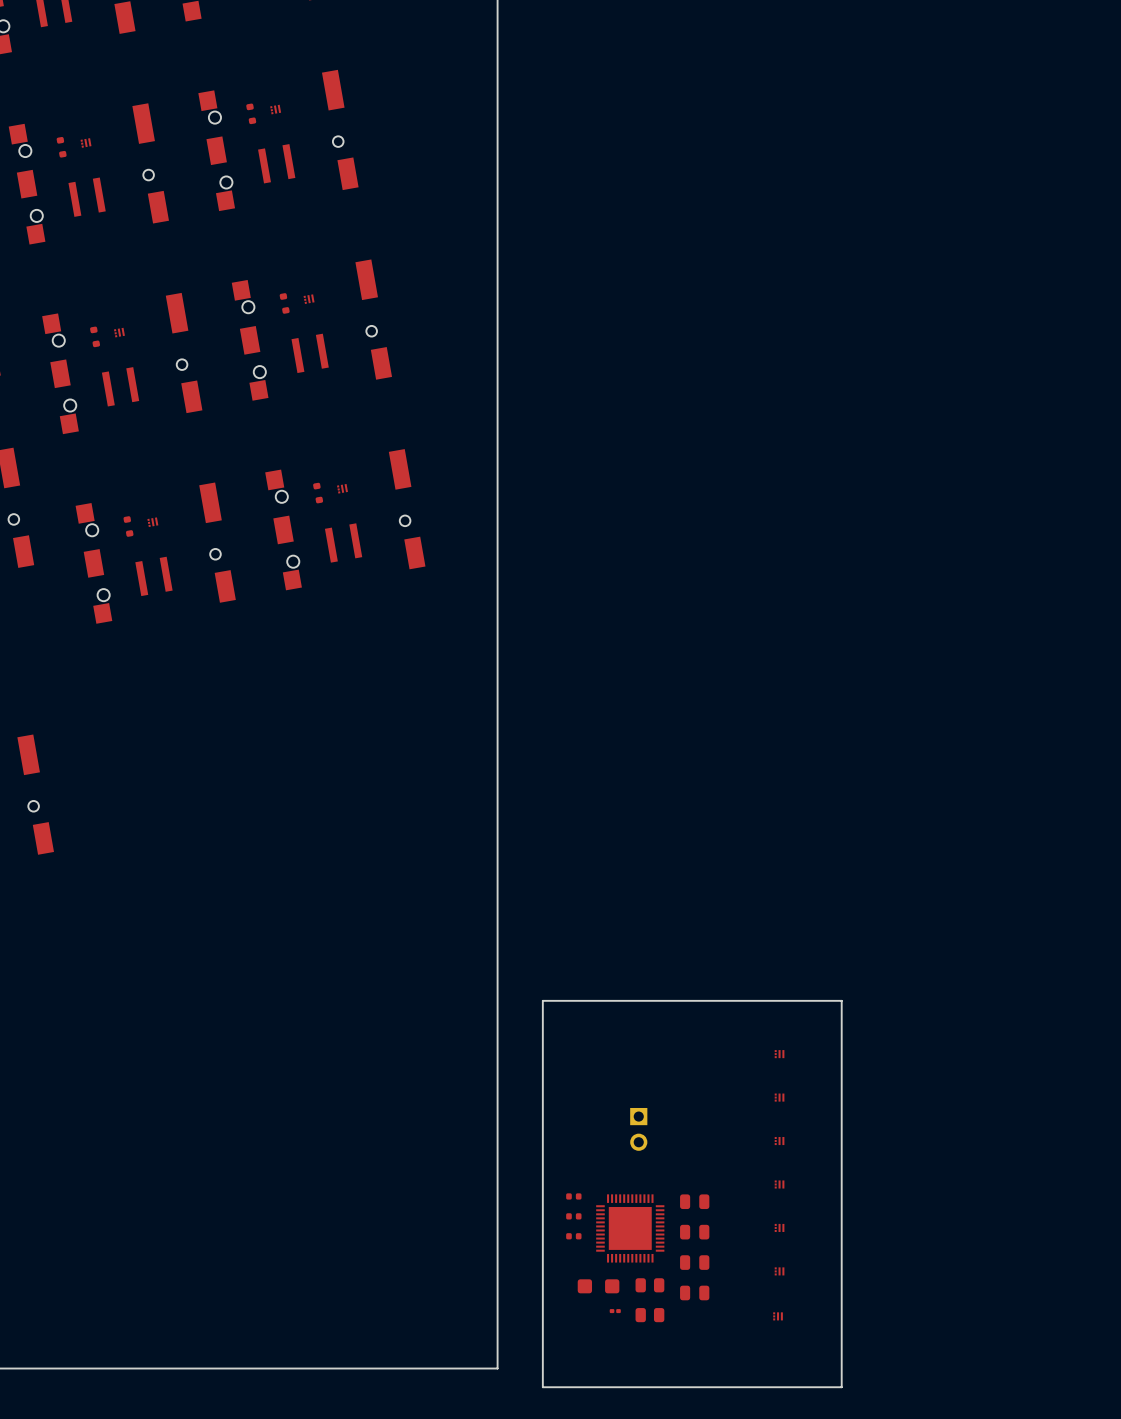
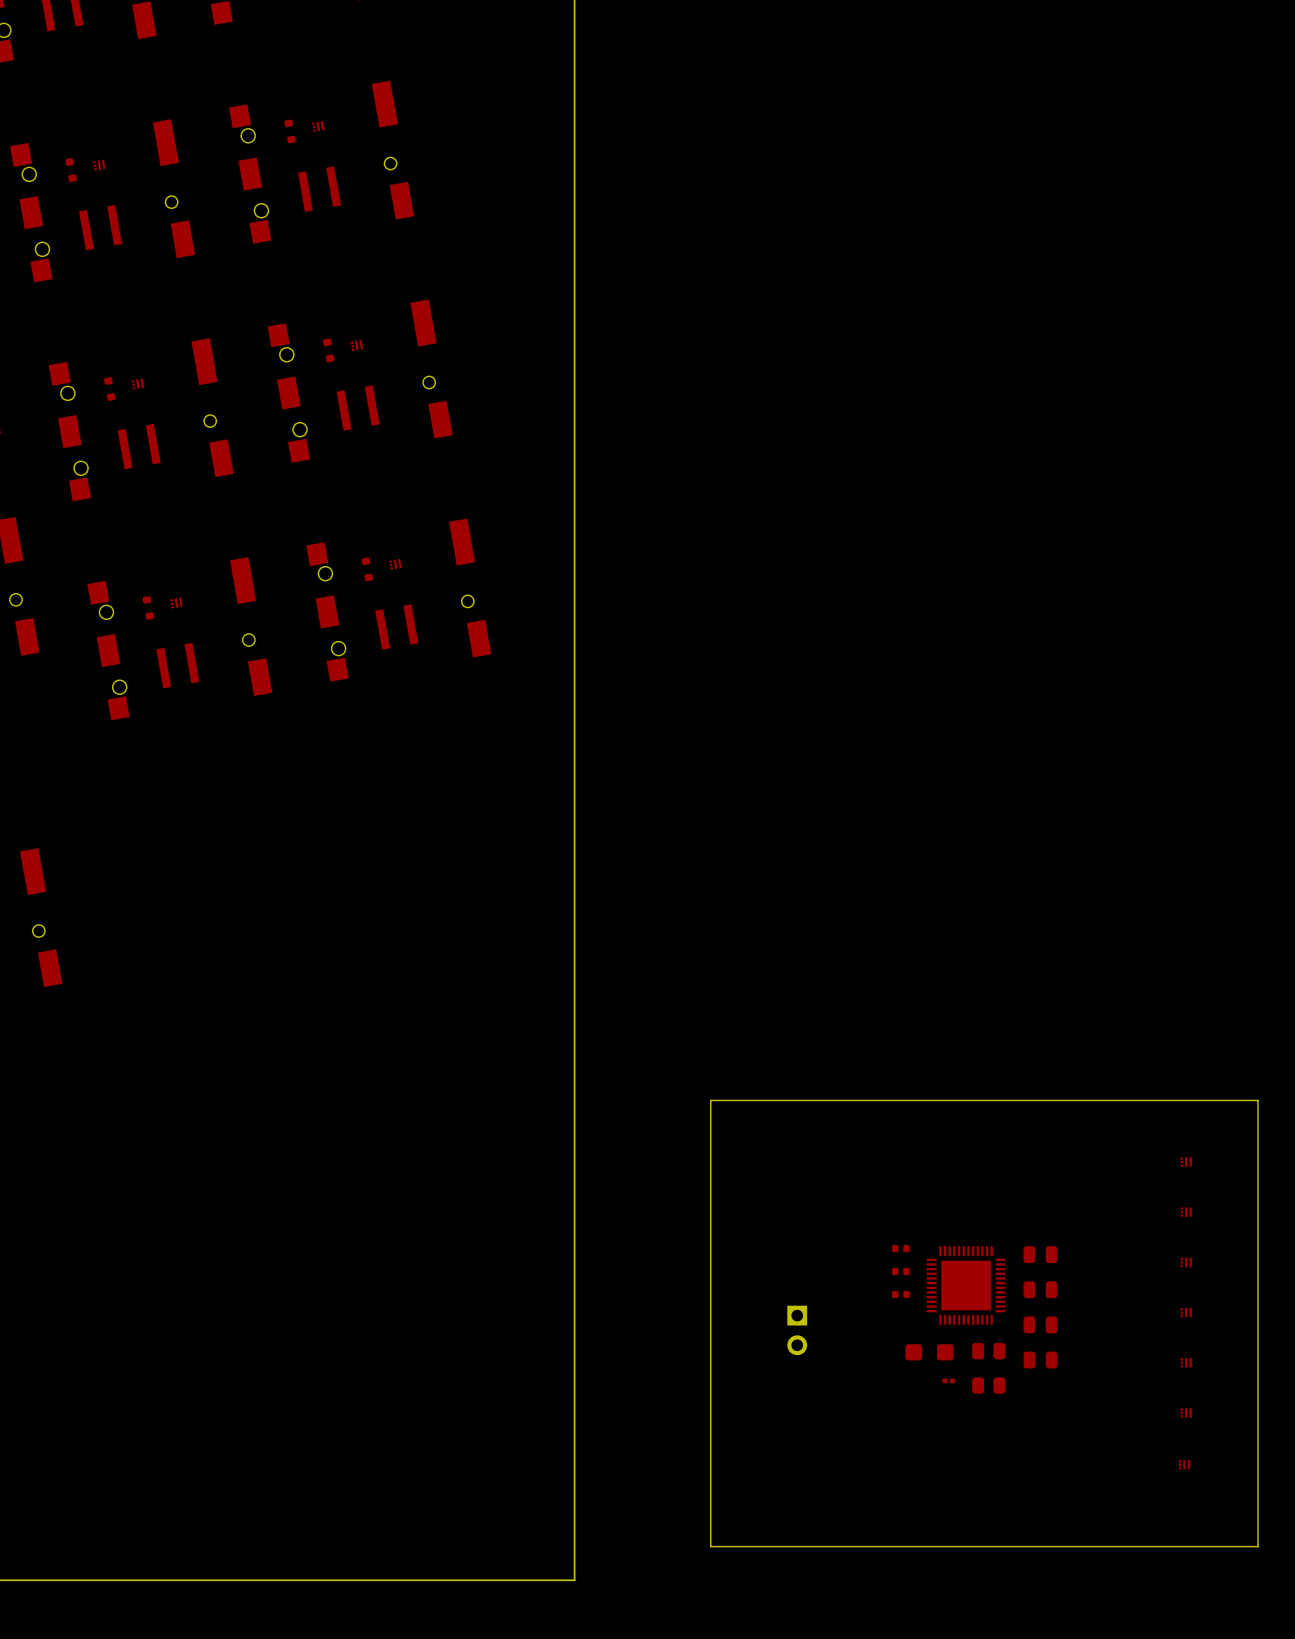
board edge: none -> (1258, 1100) (710, 1100) (710, 1546) (1258, 1546) (1258, 1100)
board edge: (841, 1000) (542, 1000) (542, 1387) (841, 1387) (841, 1000) -> none
part: none -> (1186, 1161)
part: none -> (1186, 1212)
part: (779, 1054) -> none
part: none -> (900, 1248)
part: none -> (1040, 1254)
part footprint: [774, 1093, 785, 1102] -> [892, 1267, 910, 1276]
part: none -> (1186, 1262)
part: none -> (1040, 1289)
part: none -> (900, 1294)
part position: (638, 1129) -> (797, 1330)
part: none -> (1186, 1312)
part: (779, 1141) -> none
part: none -> (1040, 1324)
part: none -> (988, 1351)
part: none -> (1040, 1360)
part: none -> (1186, 1362)
part: (779, 1184) -> none
part: (573, 1196) -> none
part: none -> (988, 1385)
part: (694, 1201) -> none
part: (573, 1216) -> none
part: none -> (1186, 1412)
part: (779, 1227) -> none
part position: (630, 1228) -> (966, 1285)
part: (694, 1232) -> none
part: (573, 1236) -> none
part: (694, 1262) -> none
part: none -> (1184, 1464)
part: (779, 1271) -> none
part: (649, 1285) -> none
part position: (598, 1286) -> (929, 1352)
part: (694, 1292) -> none
part position: (615, 1311) -> (948, 1380)
part: (649, 1315) -> none
part: (778, 1316) -> none

